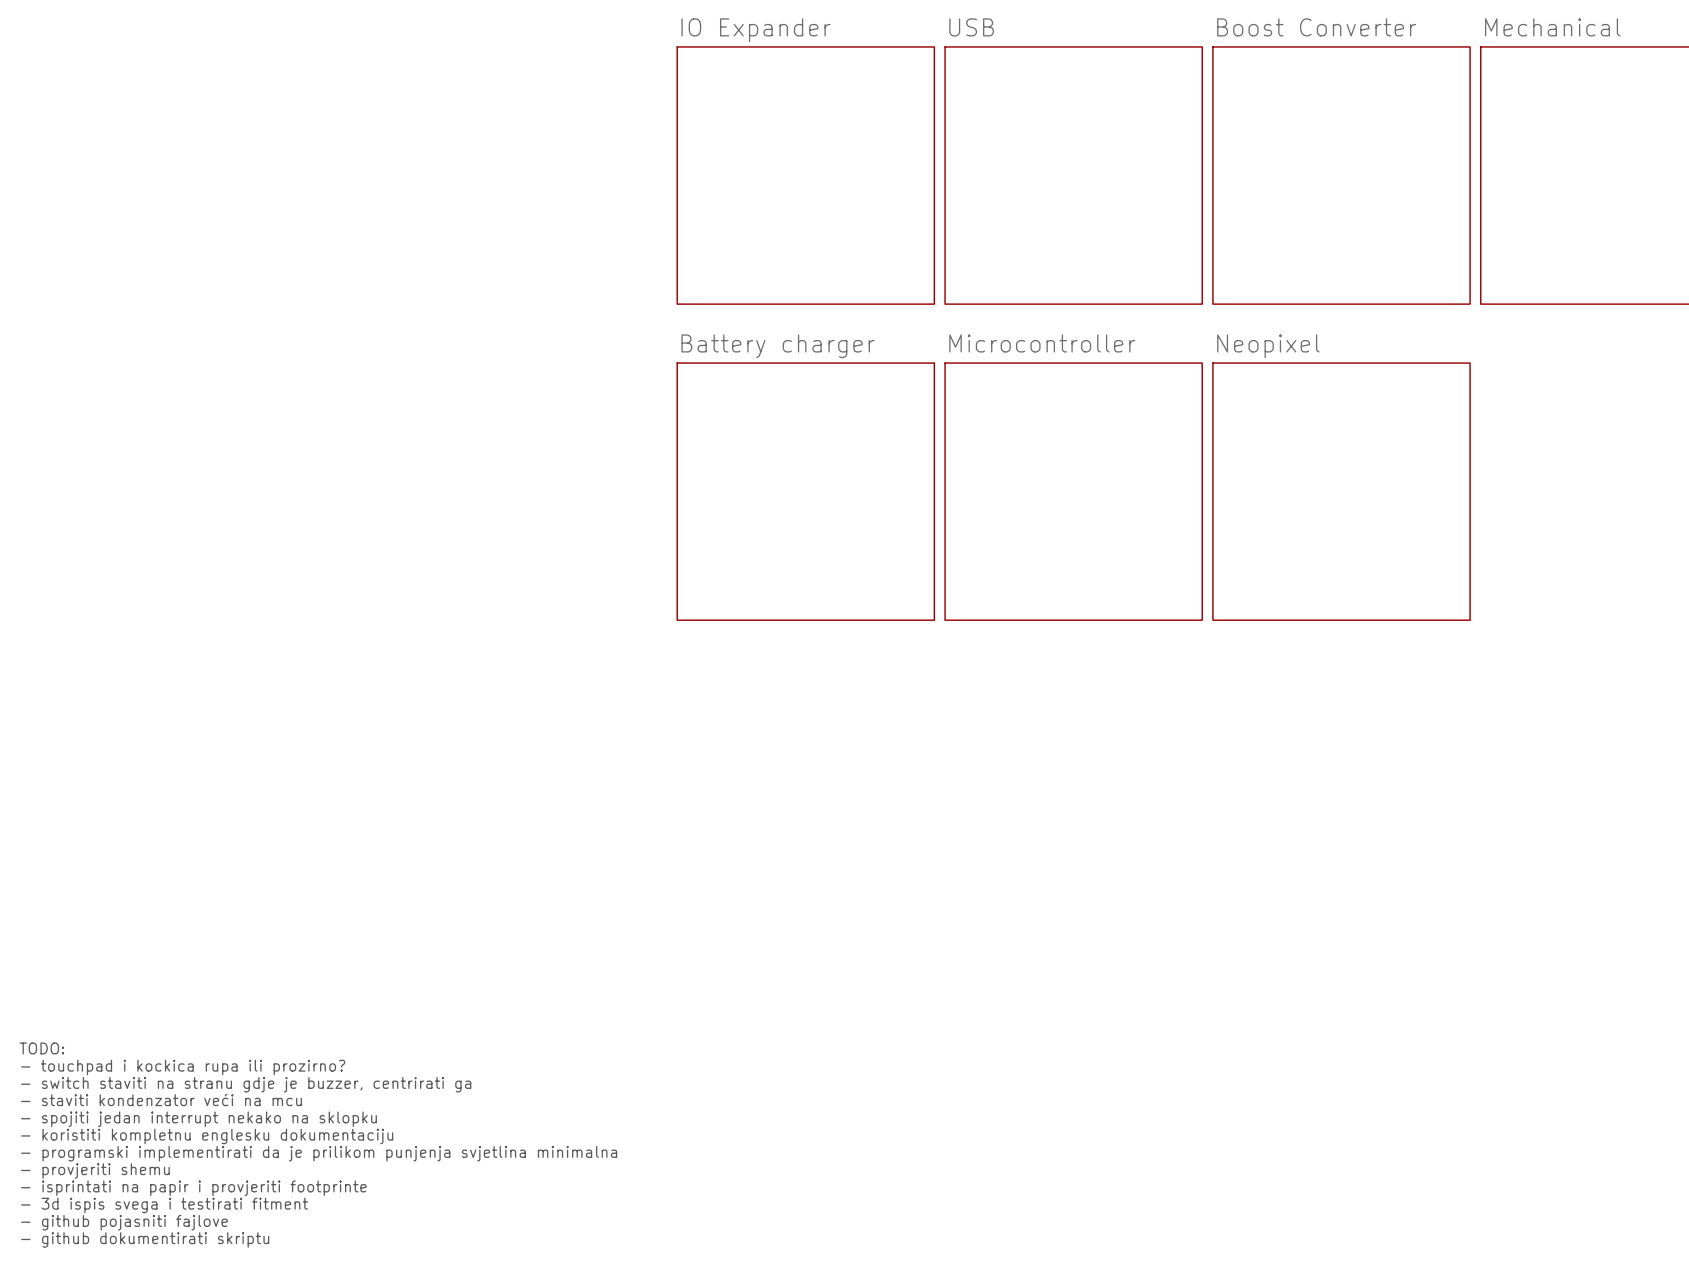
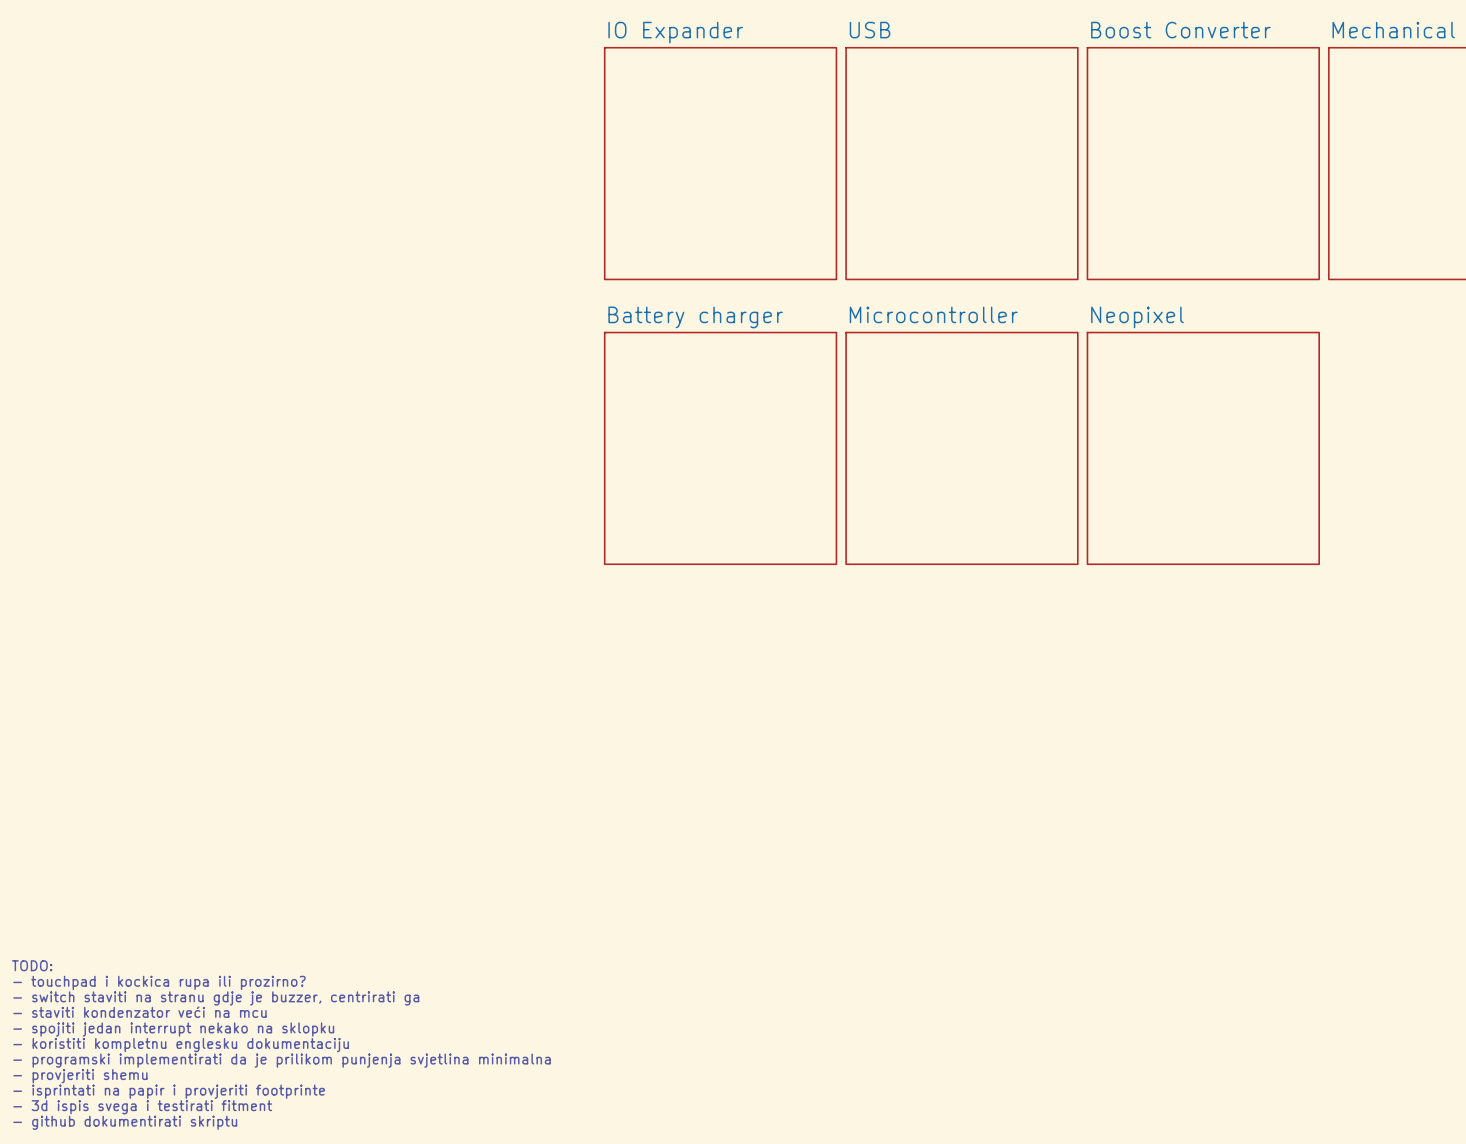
text: TODO: (41, 1048) -> none
text: - touchpad i kockica rupa ili prozirno? (183, 1067) -> TODO: (32, 965)
text: - switch staviti na stranu gdje je buzzer, centrirati ga (246, 1084) -> - touchpad i kockica rupa ili prozirno? (159, 982)
text: - staviti kondenzator veći na mcu (161, 1099) -> - switch staviti na stranu gdje je buzzer, centrirati ga (216, 998)
text: - spojiti jedan interrupt nekako na sklopku (198, 1119) -> - staviti kondenzator veći na mcu (139, 1012)
text: - koristiti kompletnu englesku dokumentaciju (207, 1136) -> - spojiti jedan interrupt nekako na sklopku (173, 1029)
text: - programski implementirati da je prilikom punjenja svjetlina minimalna (319, 1153) -> - koristiti kompletnu englesku dokumentaciju (181, 1045)
text: - provjeriti shemu (95, 1170) -> - programski implementirati da je prilikom punjenja svjetlina minimalna (282, 1060)
text: - isprintati na papir i provjeriti footprinte (193, 1188) -> - provjeriti shemu (80, 1076)
text: - 3d ispis svega i testirati fitment (164, 1205) -> - isprintati na papir i provjeriti footprinte (169, 1091)
text: - github pojasniti fajlove (124, 1222) -> - 3d ispis svega i testirati fitment (142, 1107)

